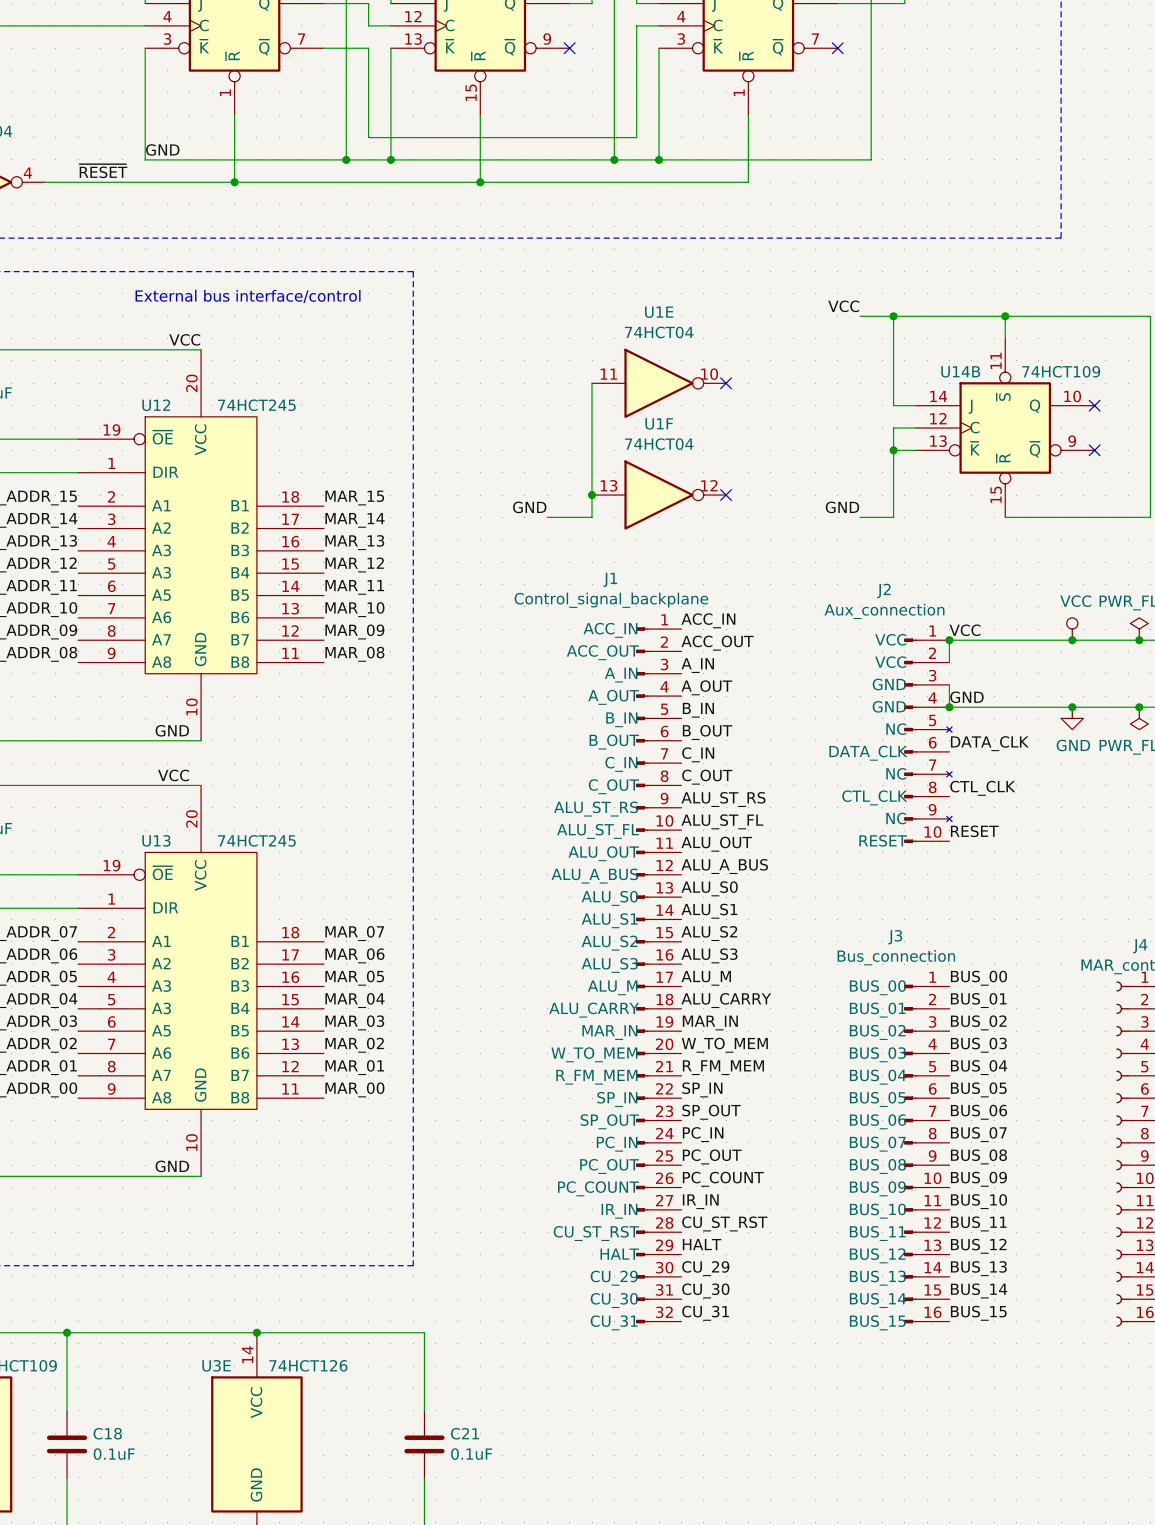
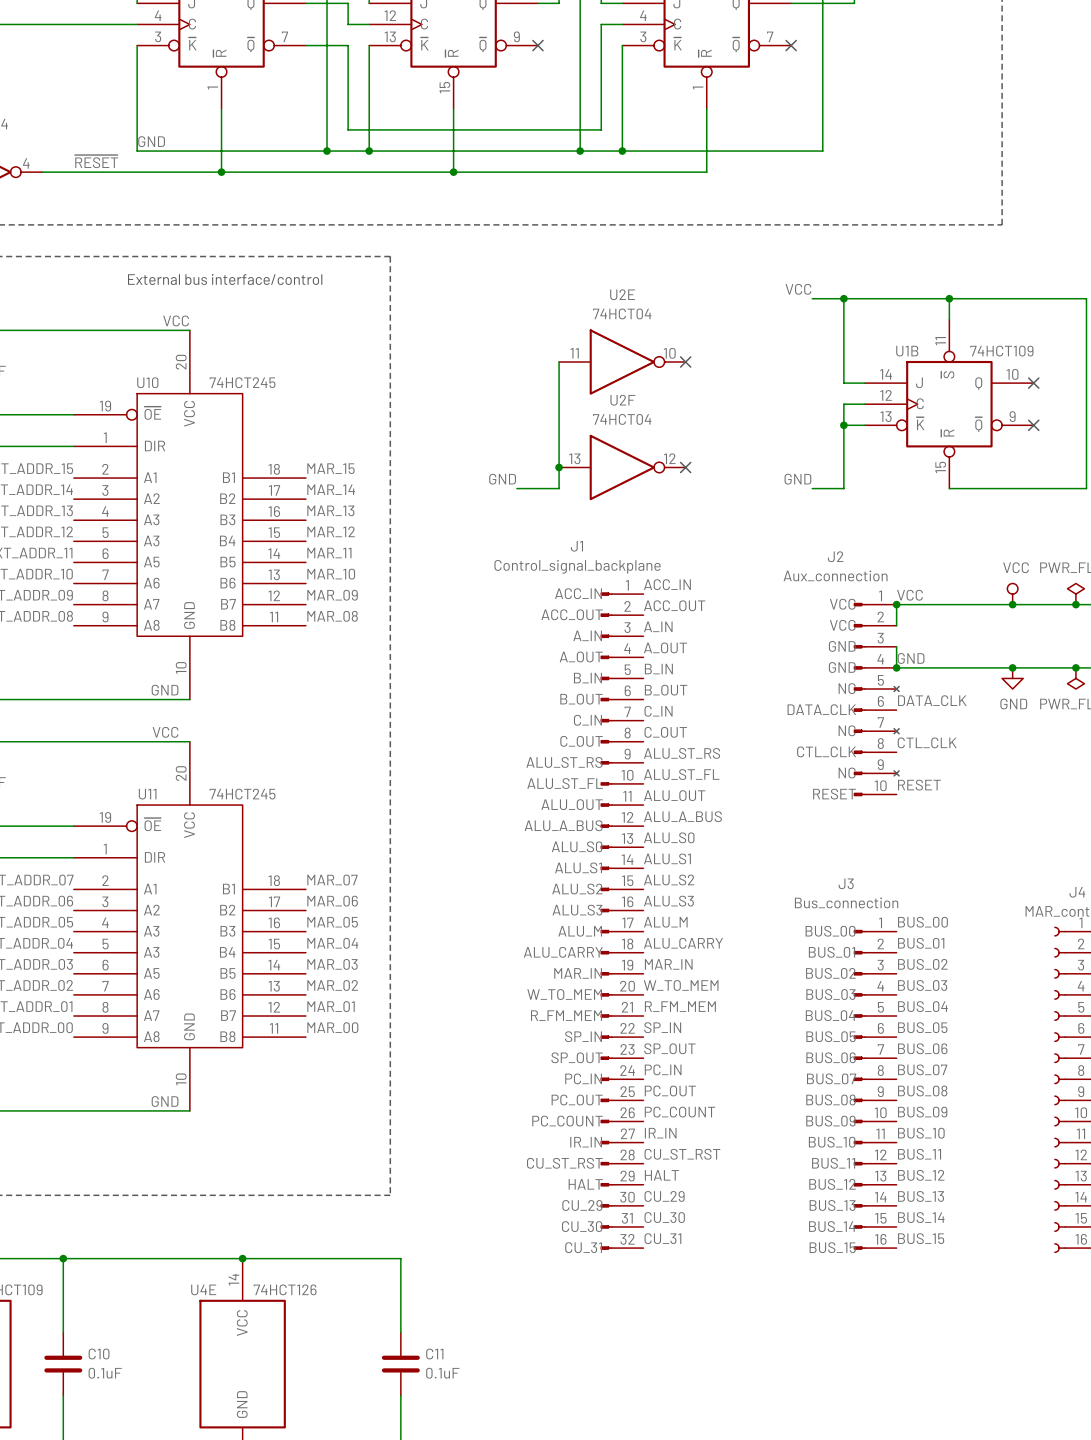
U1E name: U1E (659, 312) -> U2E (622, 294)
U14B name: U14B (960, 371) -> U1B (907, 351)
U12 name: U12 (156, 405) -> U10 (147, 382)
U1F name: U1F (659, 423) -> U2F (622, 400)
U13 name: U13 (156, 840) -> U11 (147, 794)
U3E name: U3E (216, 1365) -> U4E (203, 1289)
C18 name: C18 (107, 1433) -> C10 (99, 1354)
C21 name: C21 (464, 1433) -> C11 (434, 1354)

